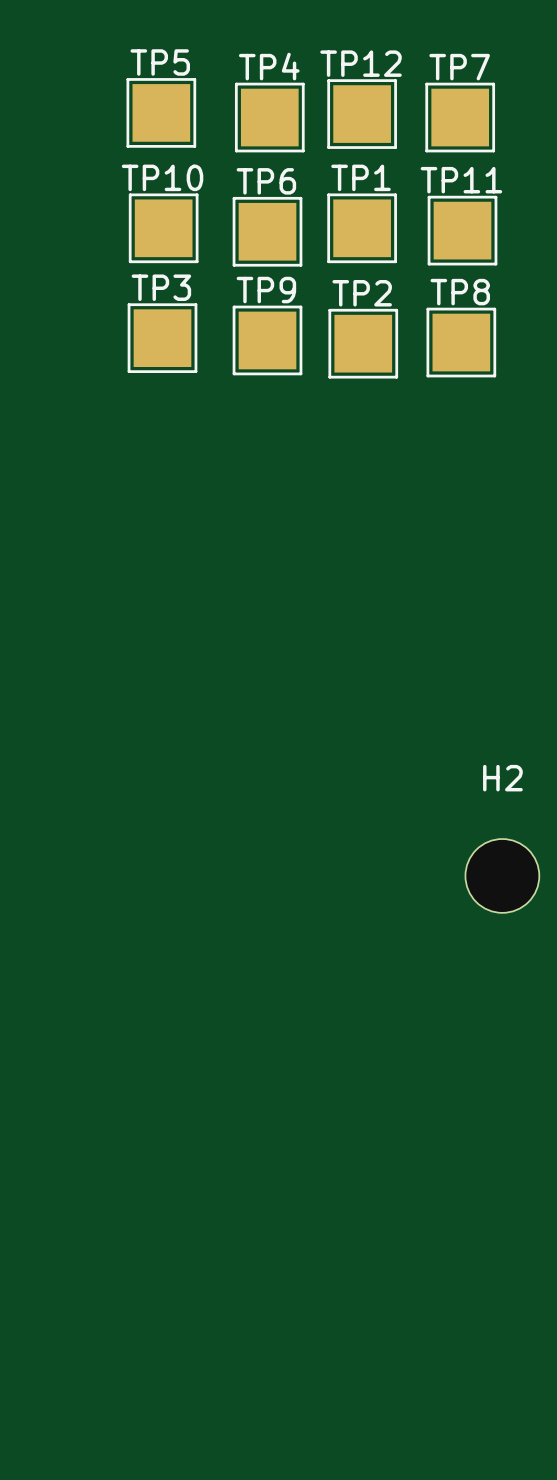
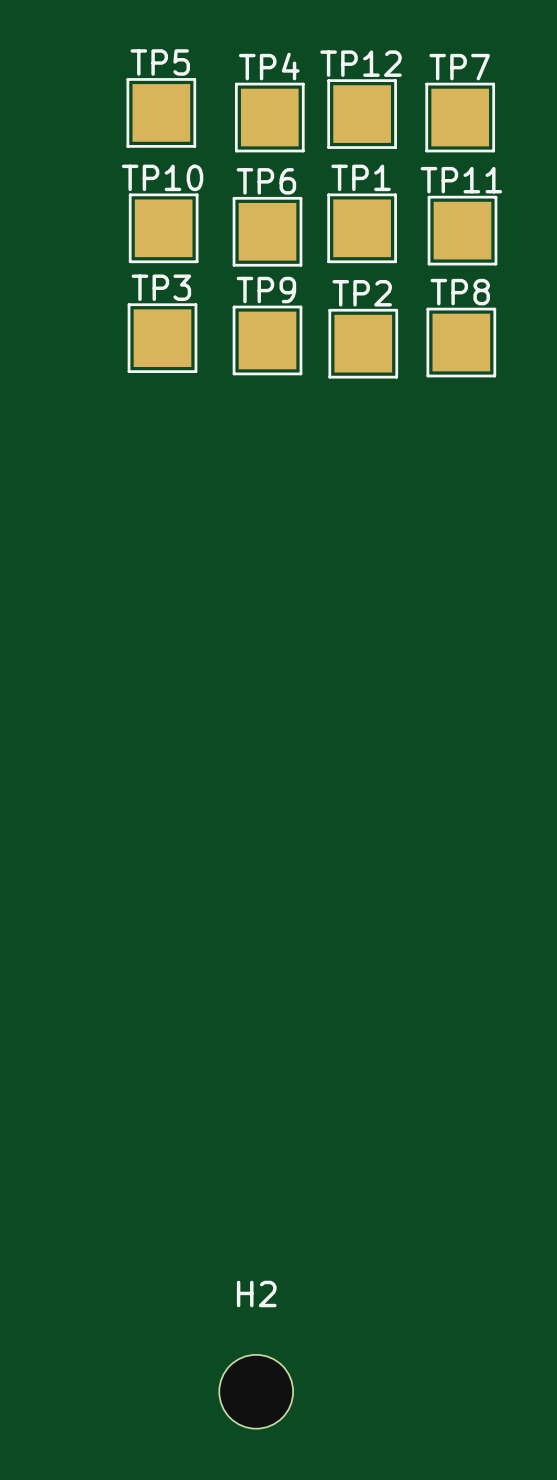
H2 position: (502, 875) -> (256, 1391)

